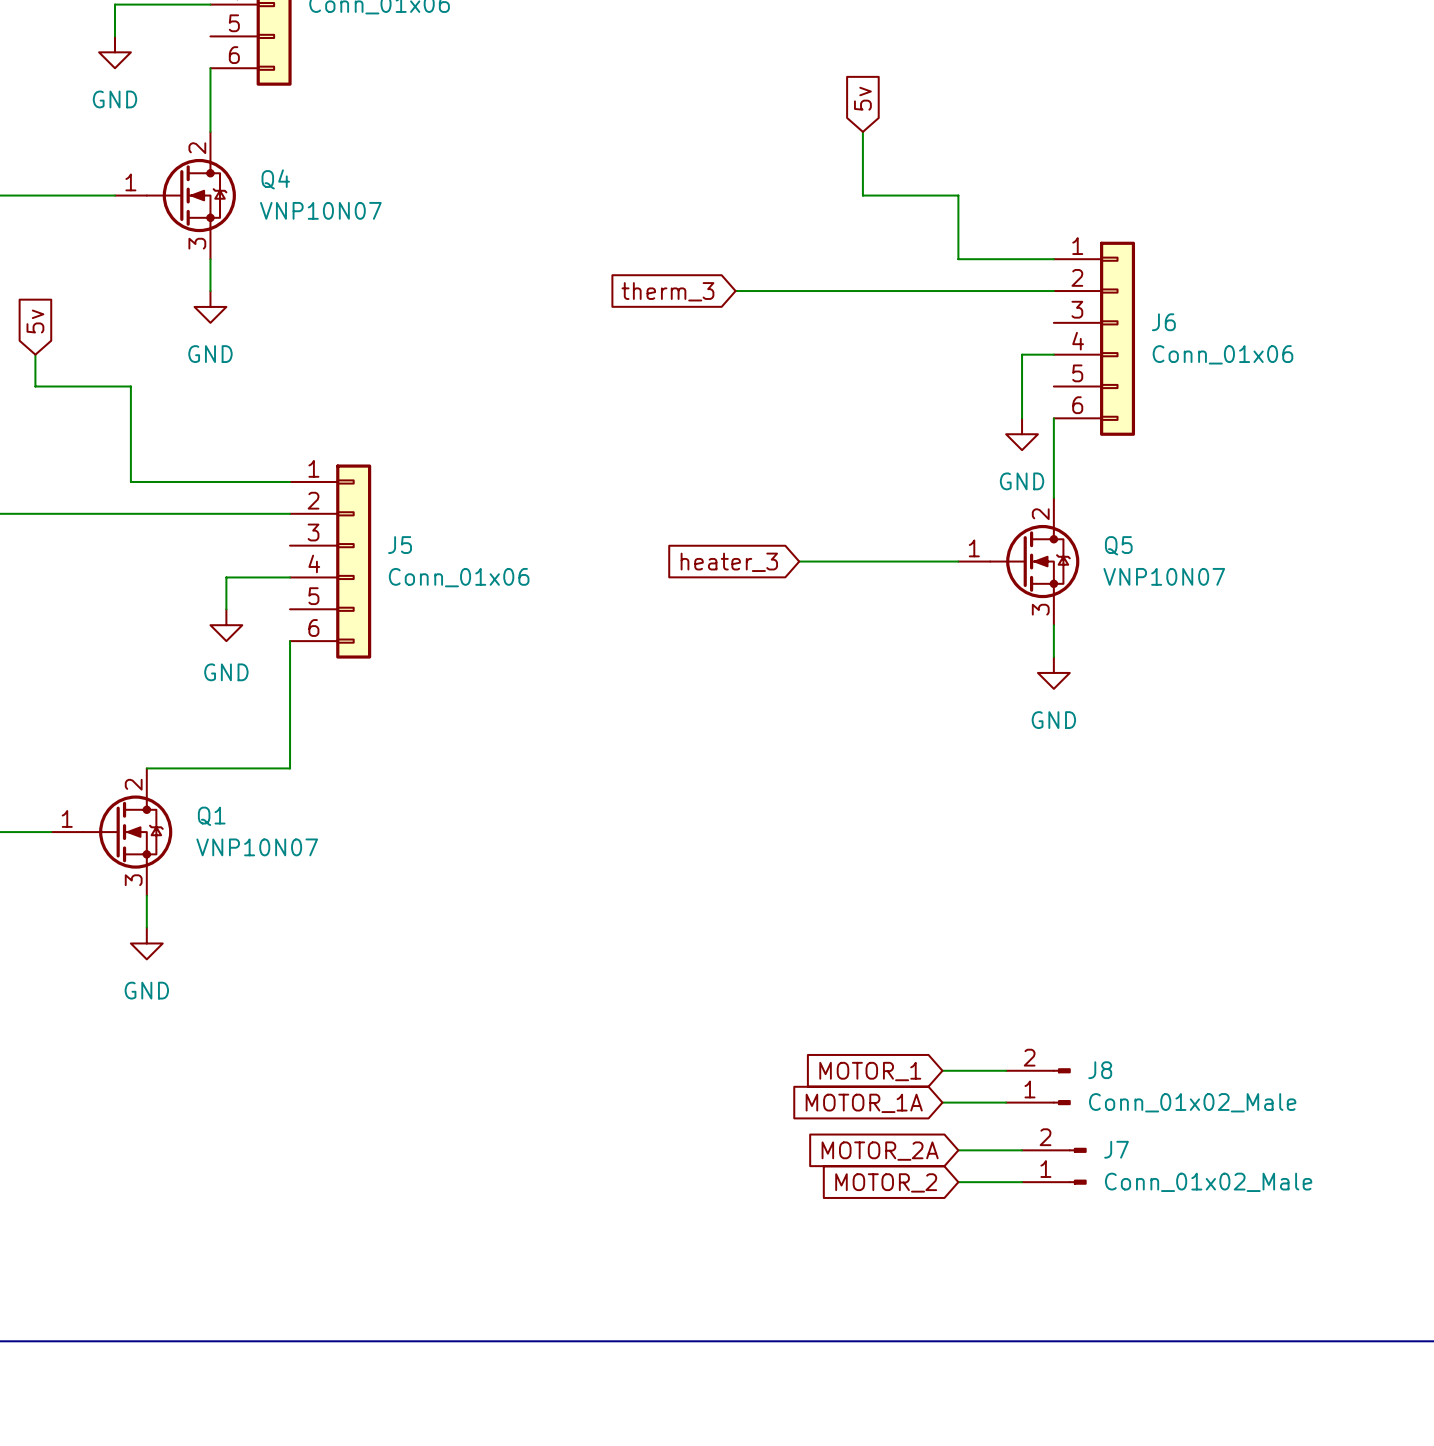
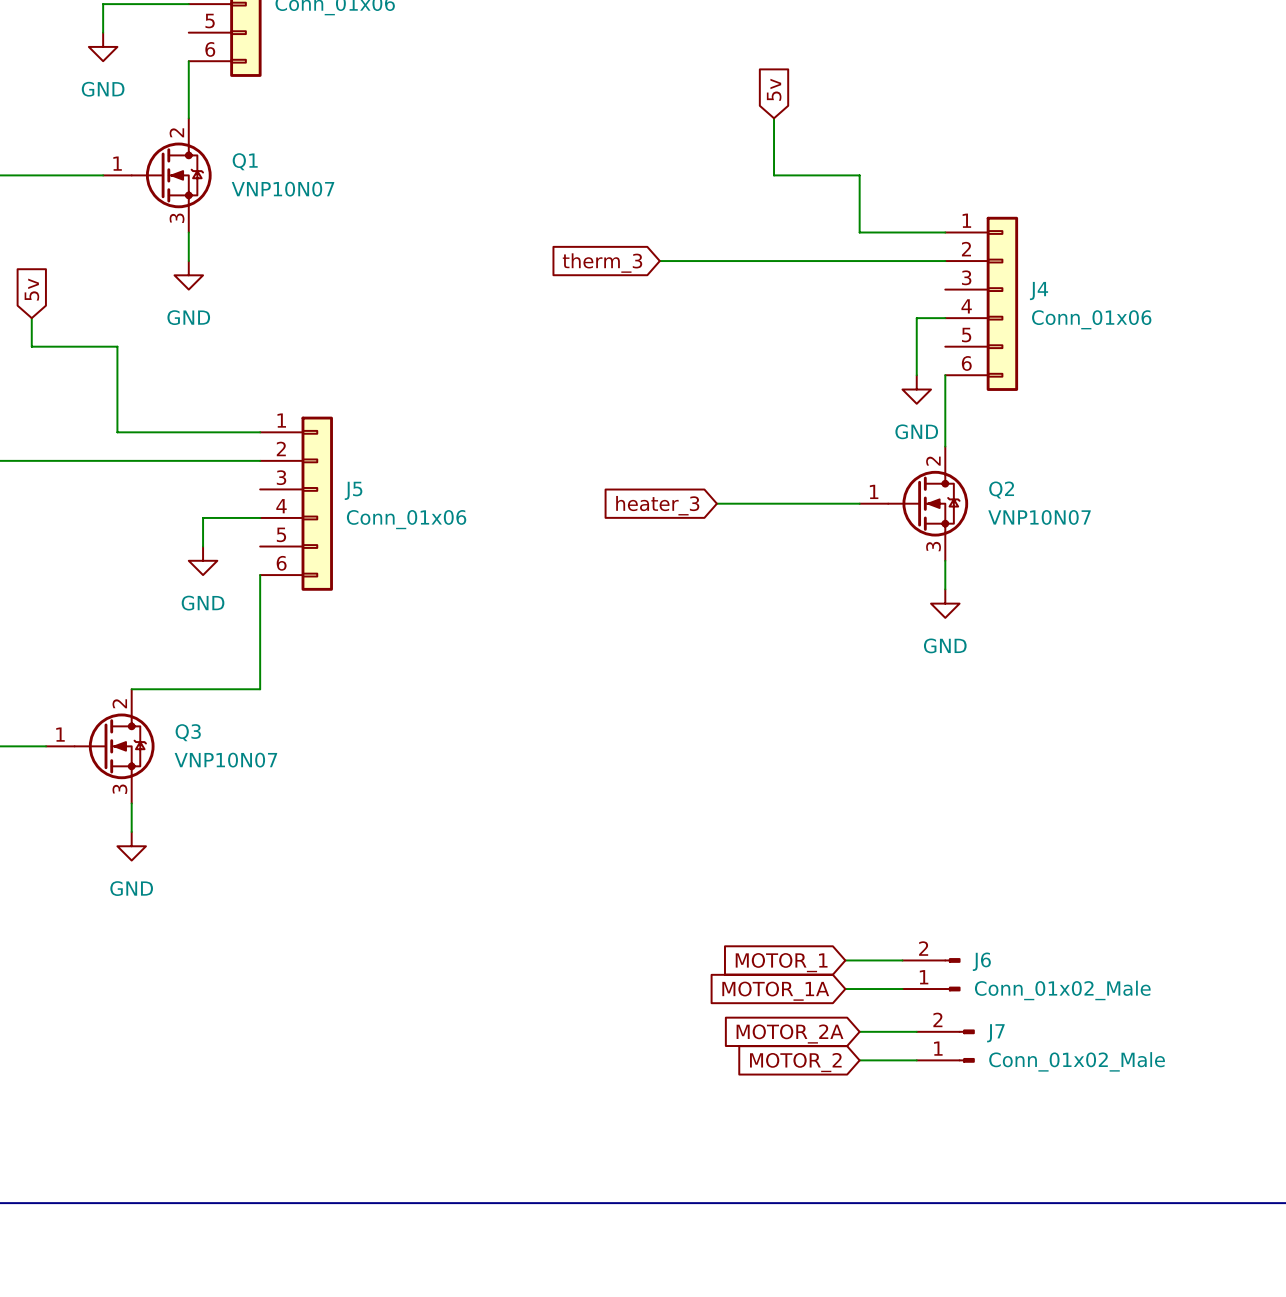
Q4 name: Q4 (275, 179) -> Q1 (245, 161)
J6 name: J6 (1163, 322) -> J4 (1039, 291)
Q5 name: Q5 (1118, 545) -> Q2 (1001, 490)
Q1 name: Q1 (211, 816) -> Q3 (188, 732)
J8 name: J8 (1100, 1070) -> J6 (981, 961)

